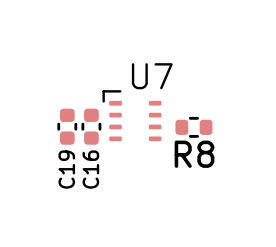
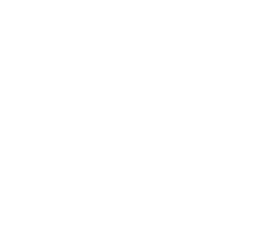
U7: (131, 115) -> none
C19: (67, 126) -> none
C16: (91, 126) -> none
R8: (193, 127) -> none

